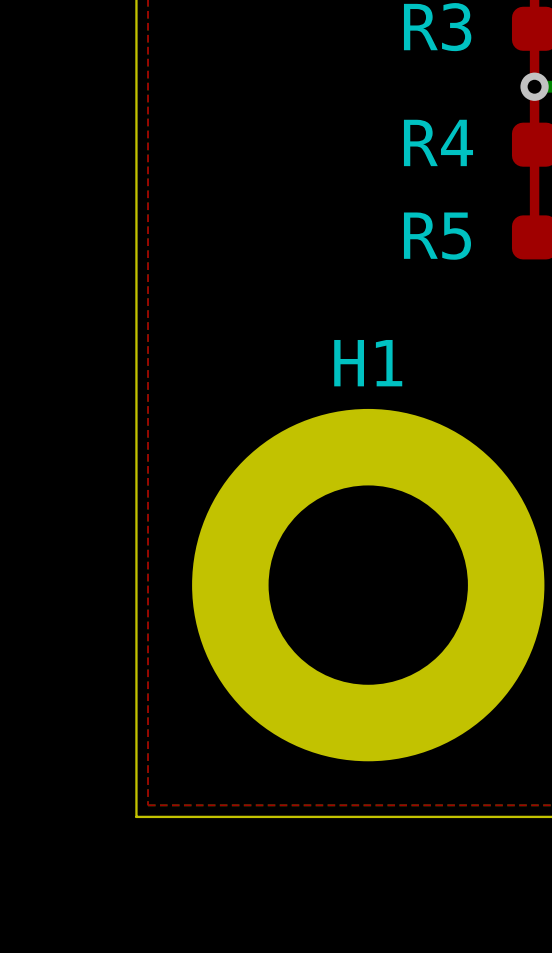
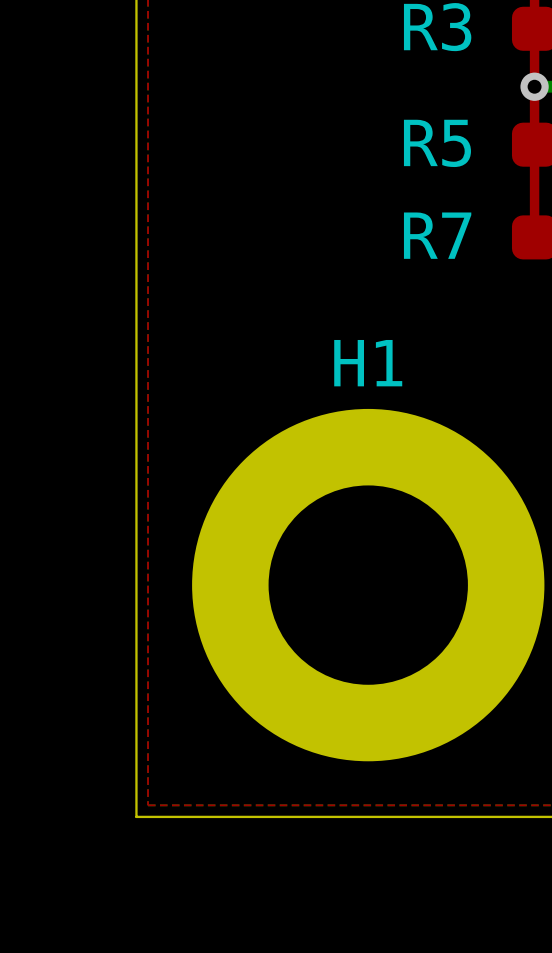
R4 name: R4 (438, 142) -> R5 (437, 143)
R5 name: R5 (437, 236) -> R7 (437, 235)

